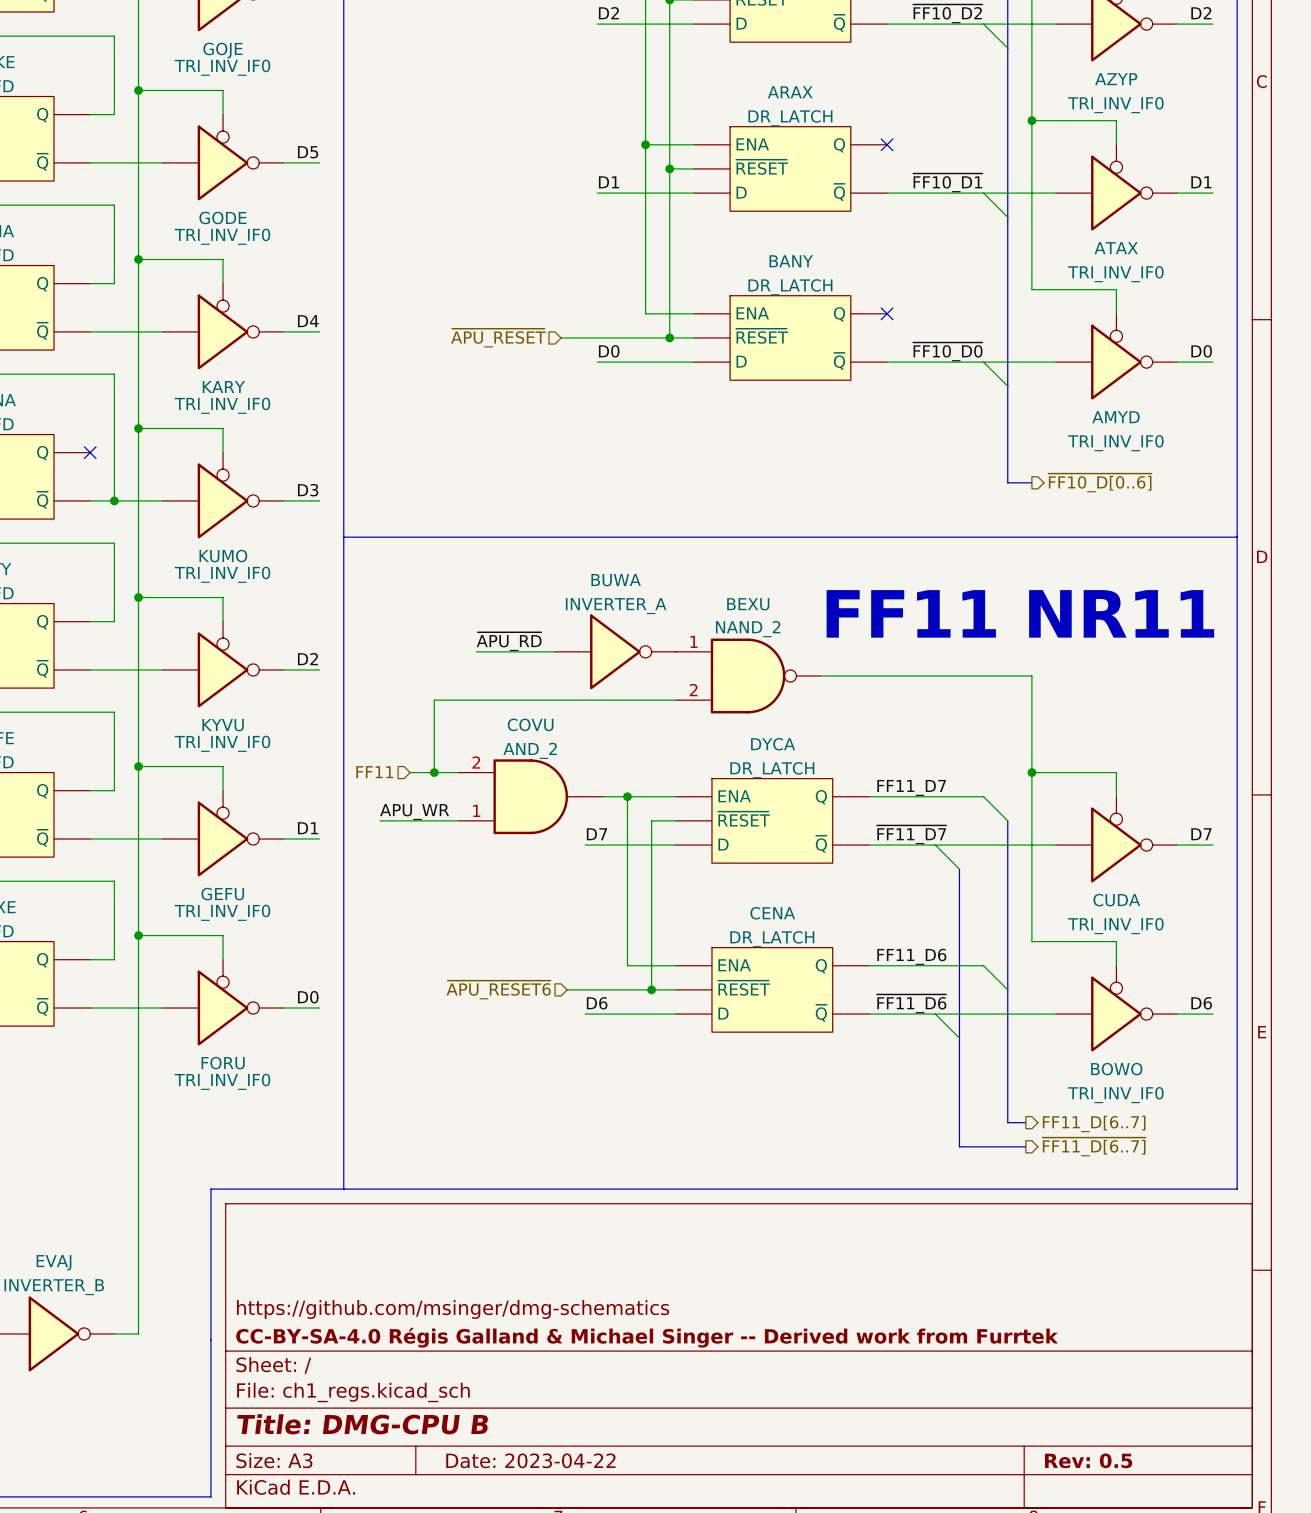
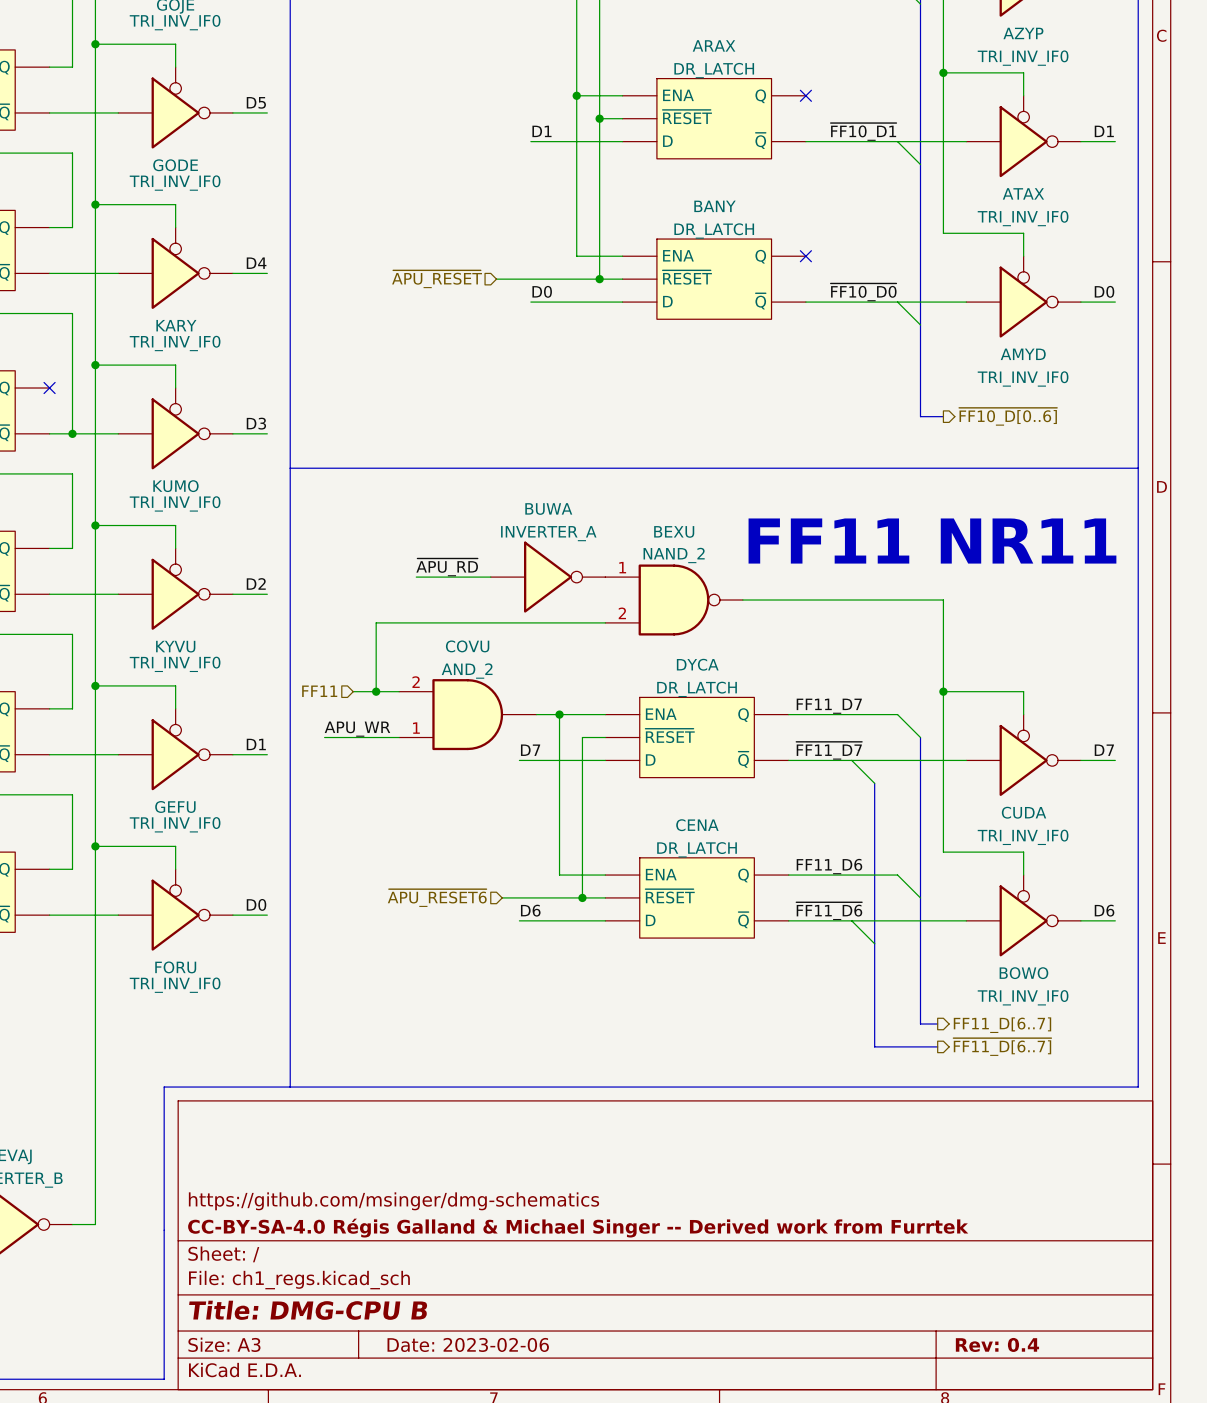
title block: Date: 2023-04-22 (530, 1460) -> Date: 2023-02-06 (468, 1344)
title block: Rev: 0.5 (1088, 1460) -> Rev: 0.4 (997, 1344)

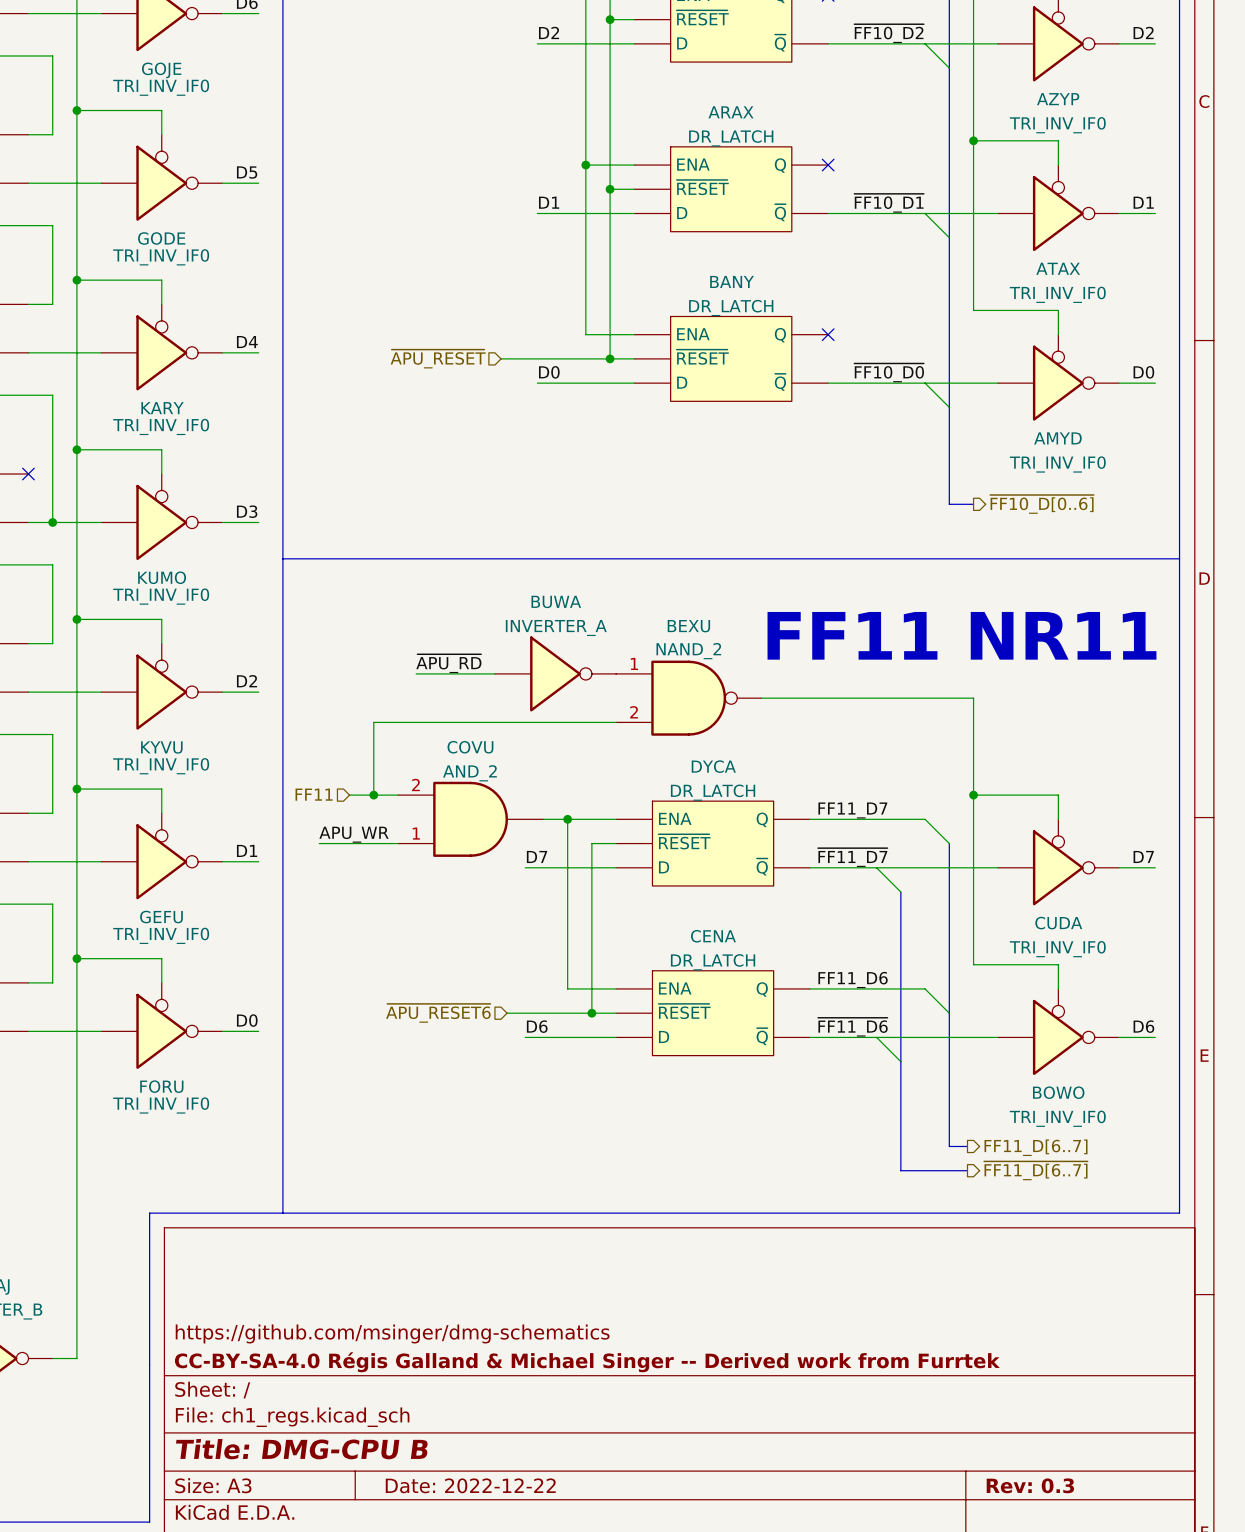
title block: Date: 2023-02-06 (468, 1344) -> Date: 2022-12-22 (470, 1485)
title block: Rev: 0.4 (997, 1344) -> Rev: 0.3 (1030, 1485)

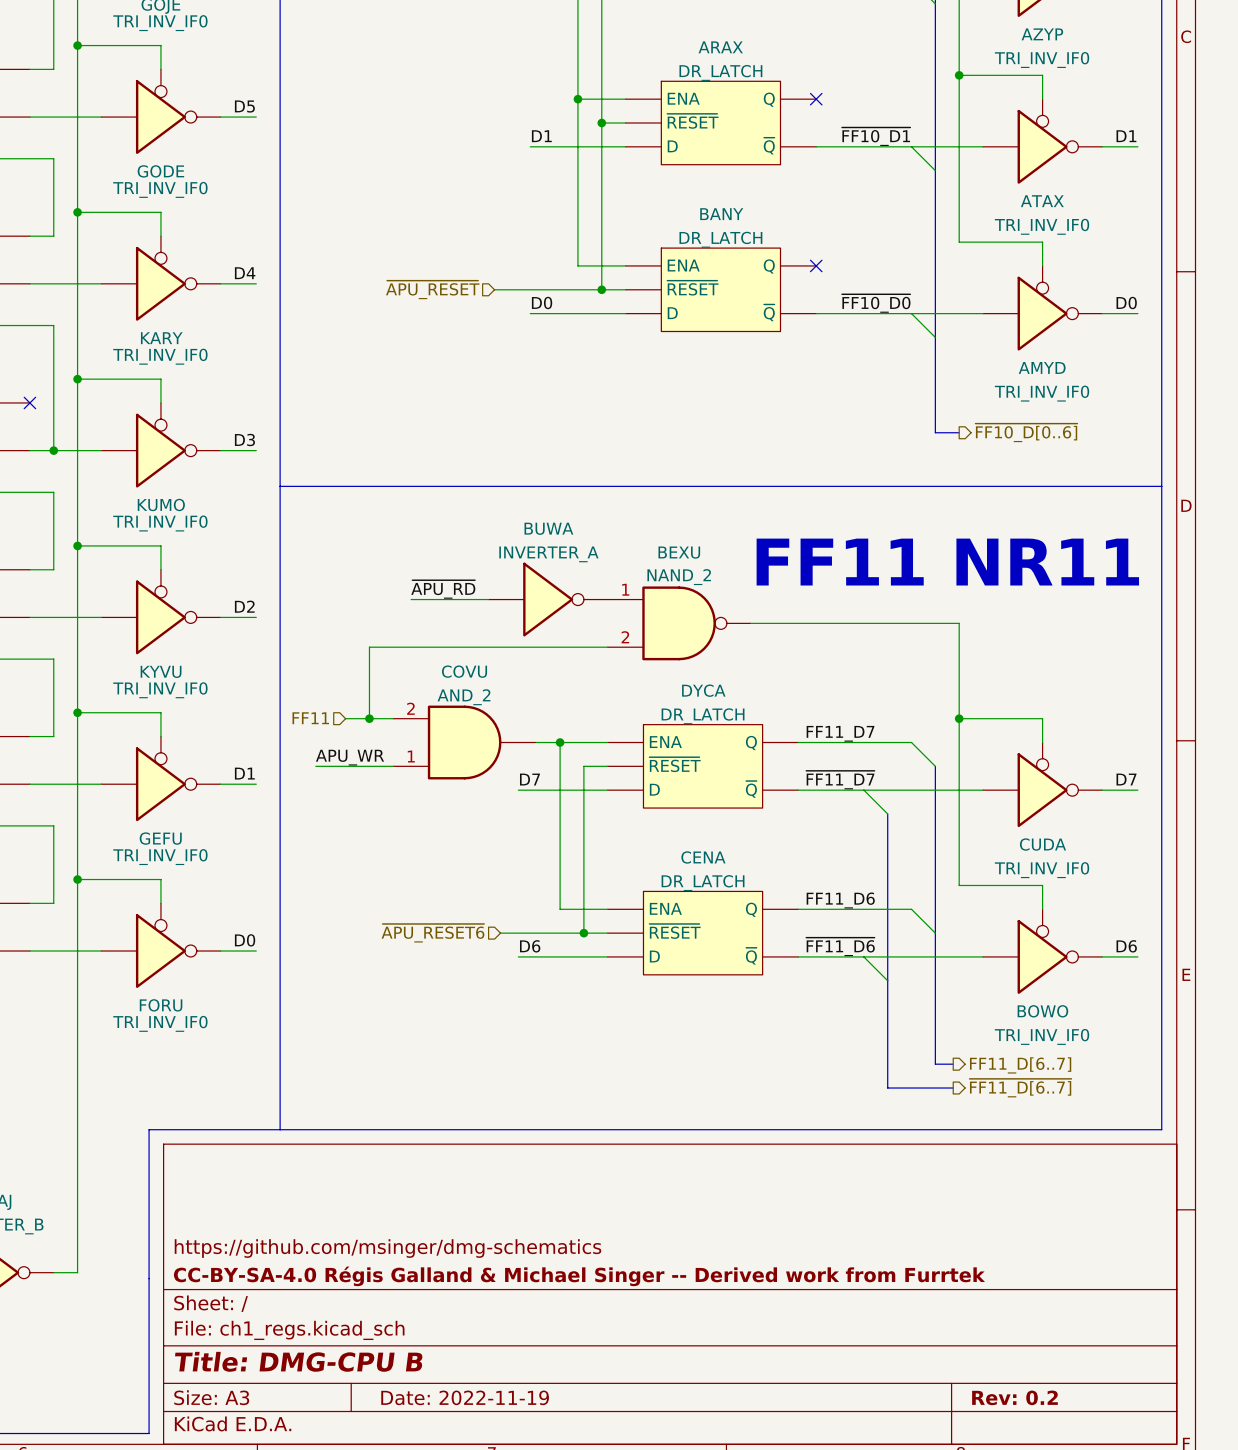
title block: Date: 2022-12-22 (470, 1485) -> Date: 2022-11-19 (465, 1397)
title block: Rev: 0.3 (1030, 1485) -> Rev: 0.2 (1014, 1397)

